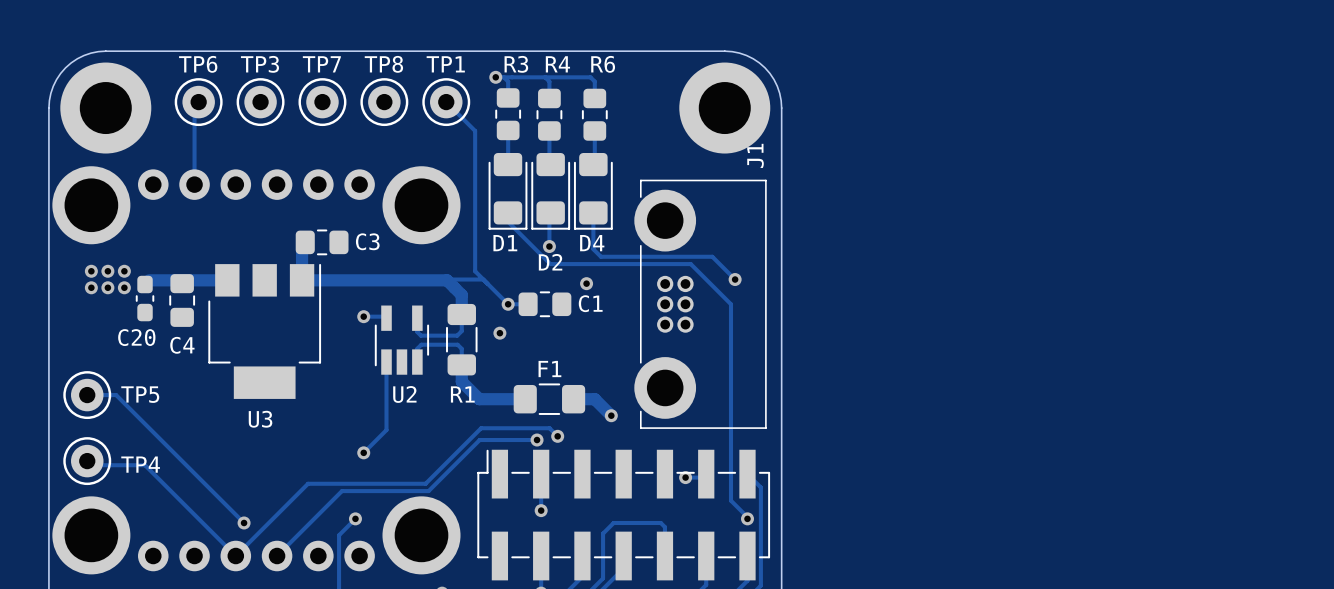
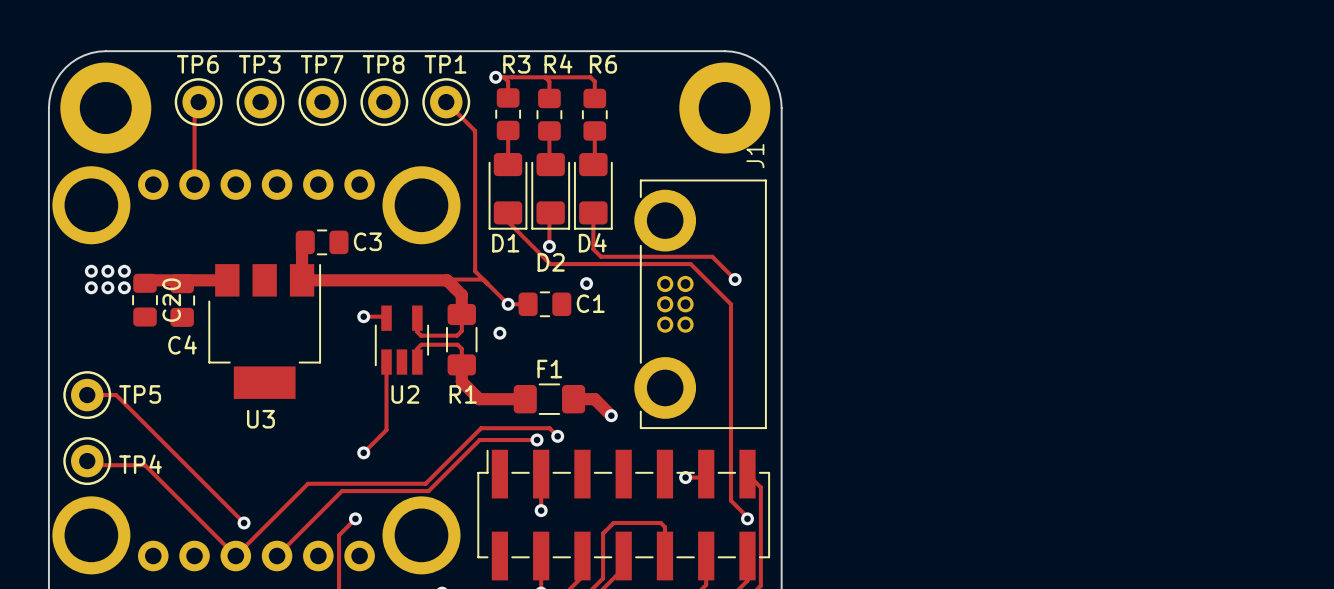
C20 footprint: [135, 275, 155, 322] -> [132, 273, 158, 327]
C20 name rotation: 0° (136, 337) -> 90° counterclockwise (171, 300)

